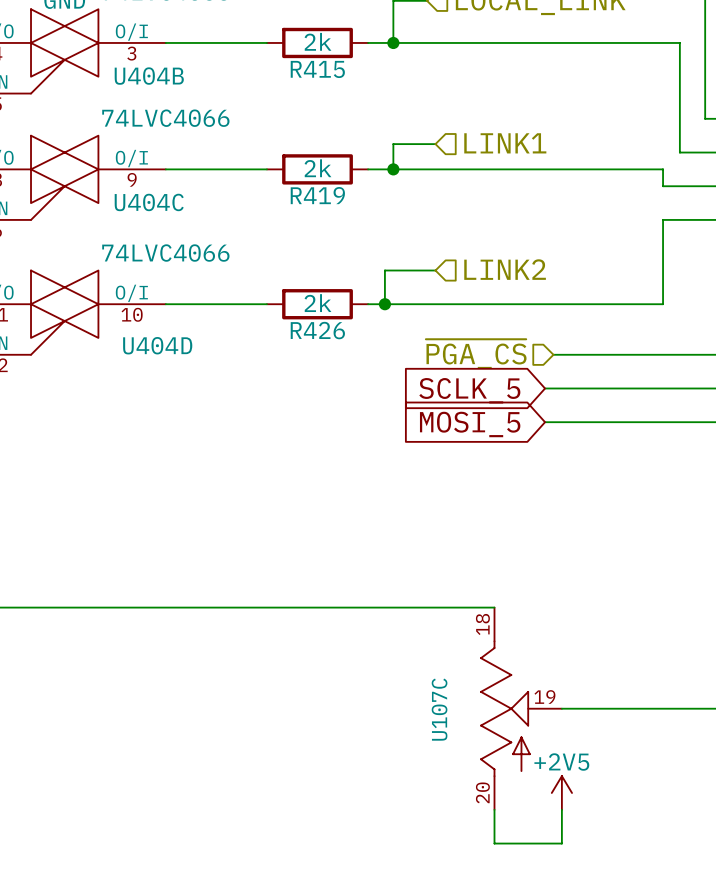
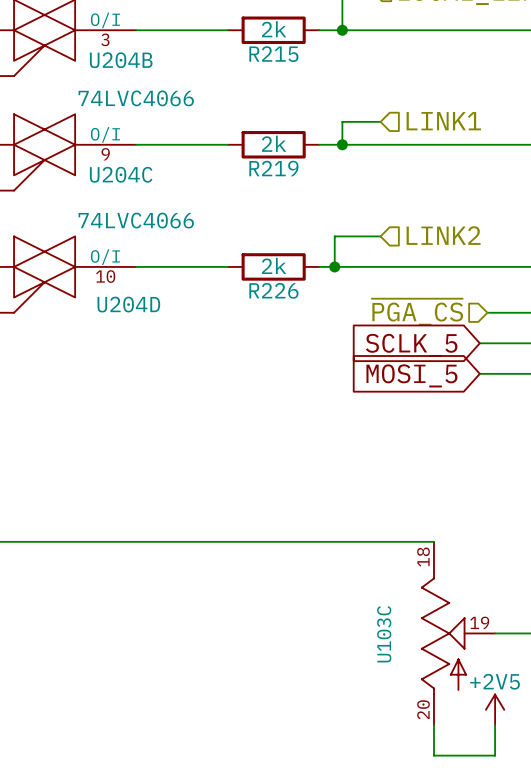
R415 name: R415 (317, 69) -> R215 (273, 54)
U404B name: U404B (149, 76) -> U204B (121, 60)
R419 name: R419 (317, 195) -> R219 (273, 168)
U404C name: U404C (149, 202) -> U204C (121, 174)
R426 name: R426 (317, 330) -> R226 (273, 290)
U404D name: U404D (157, 345) -> U204D (128, 304)
U107C name: U107C (439, 709) -> U103C (384, 634)

